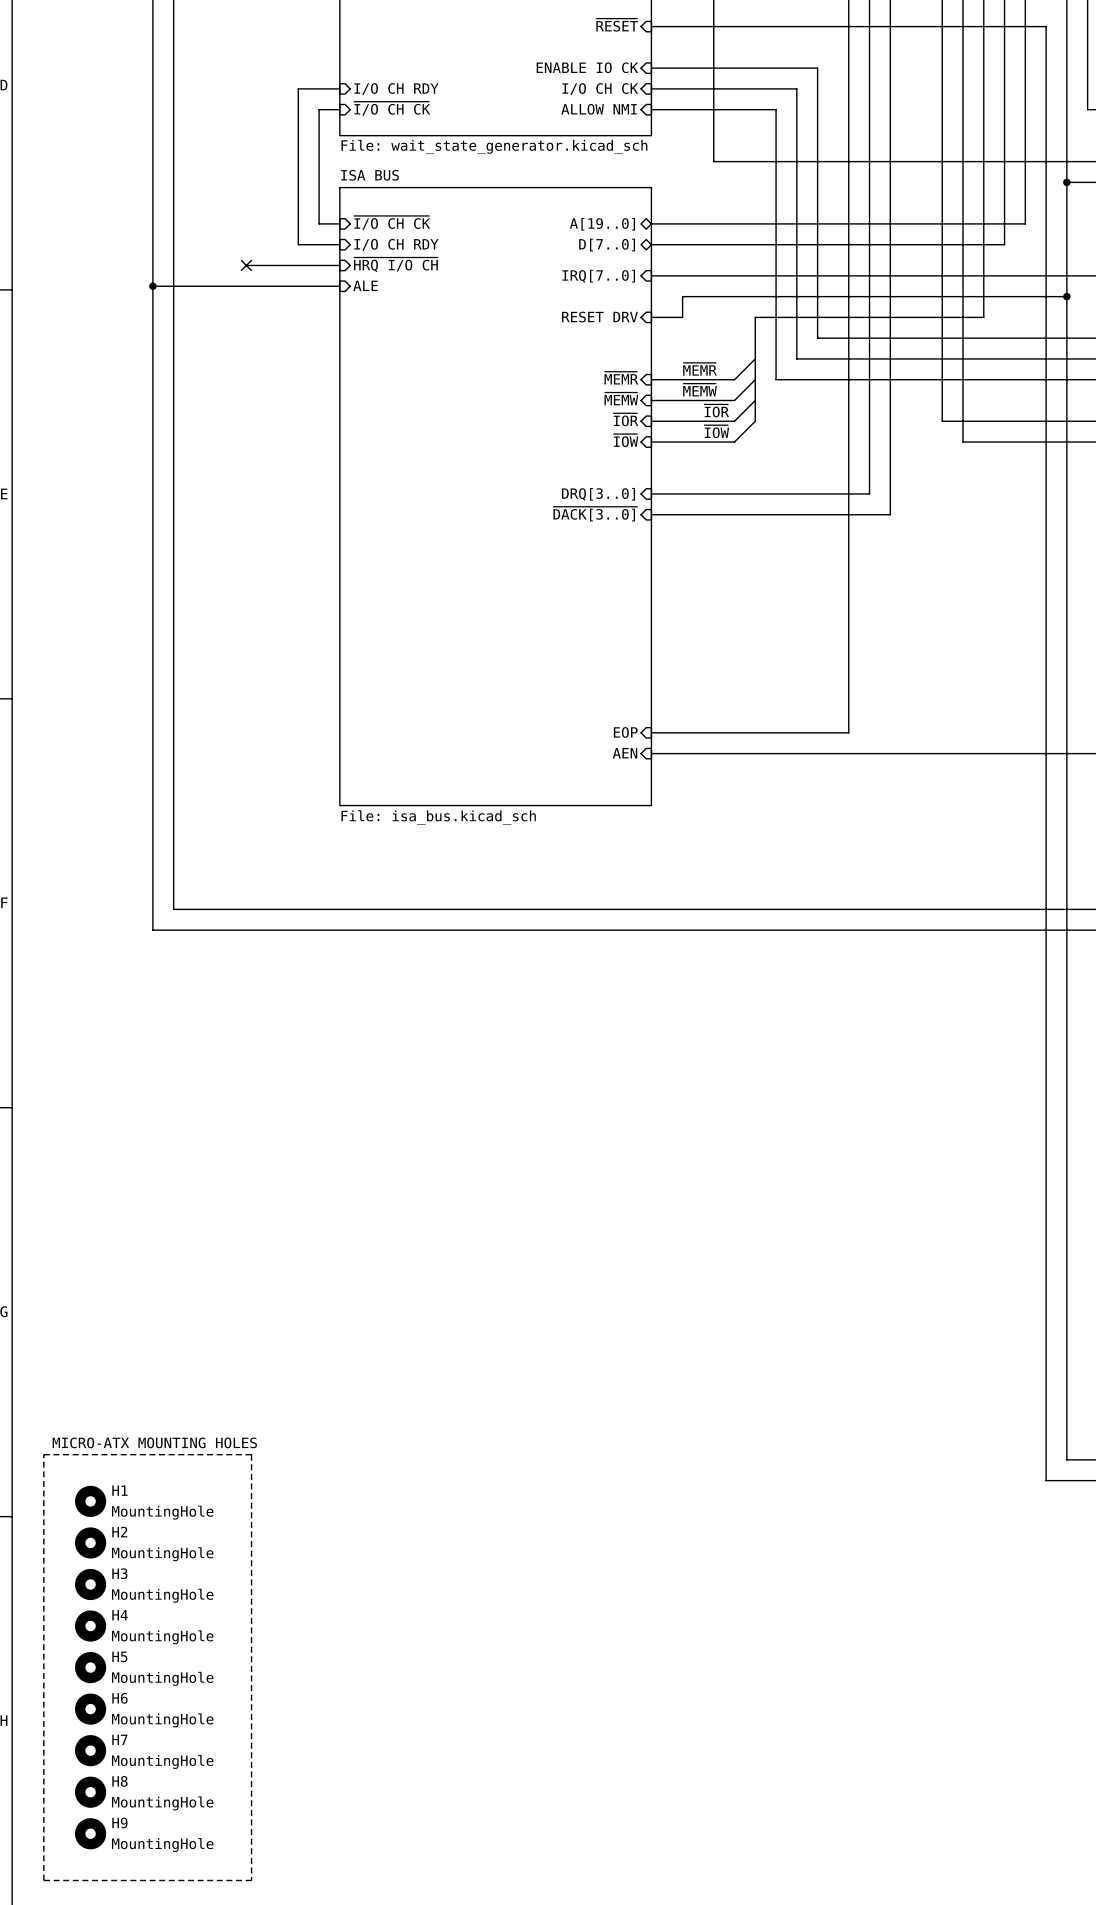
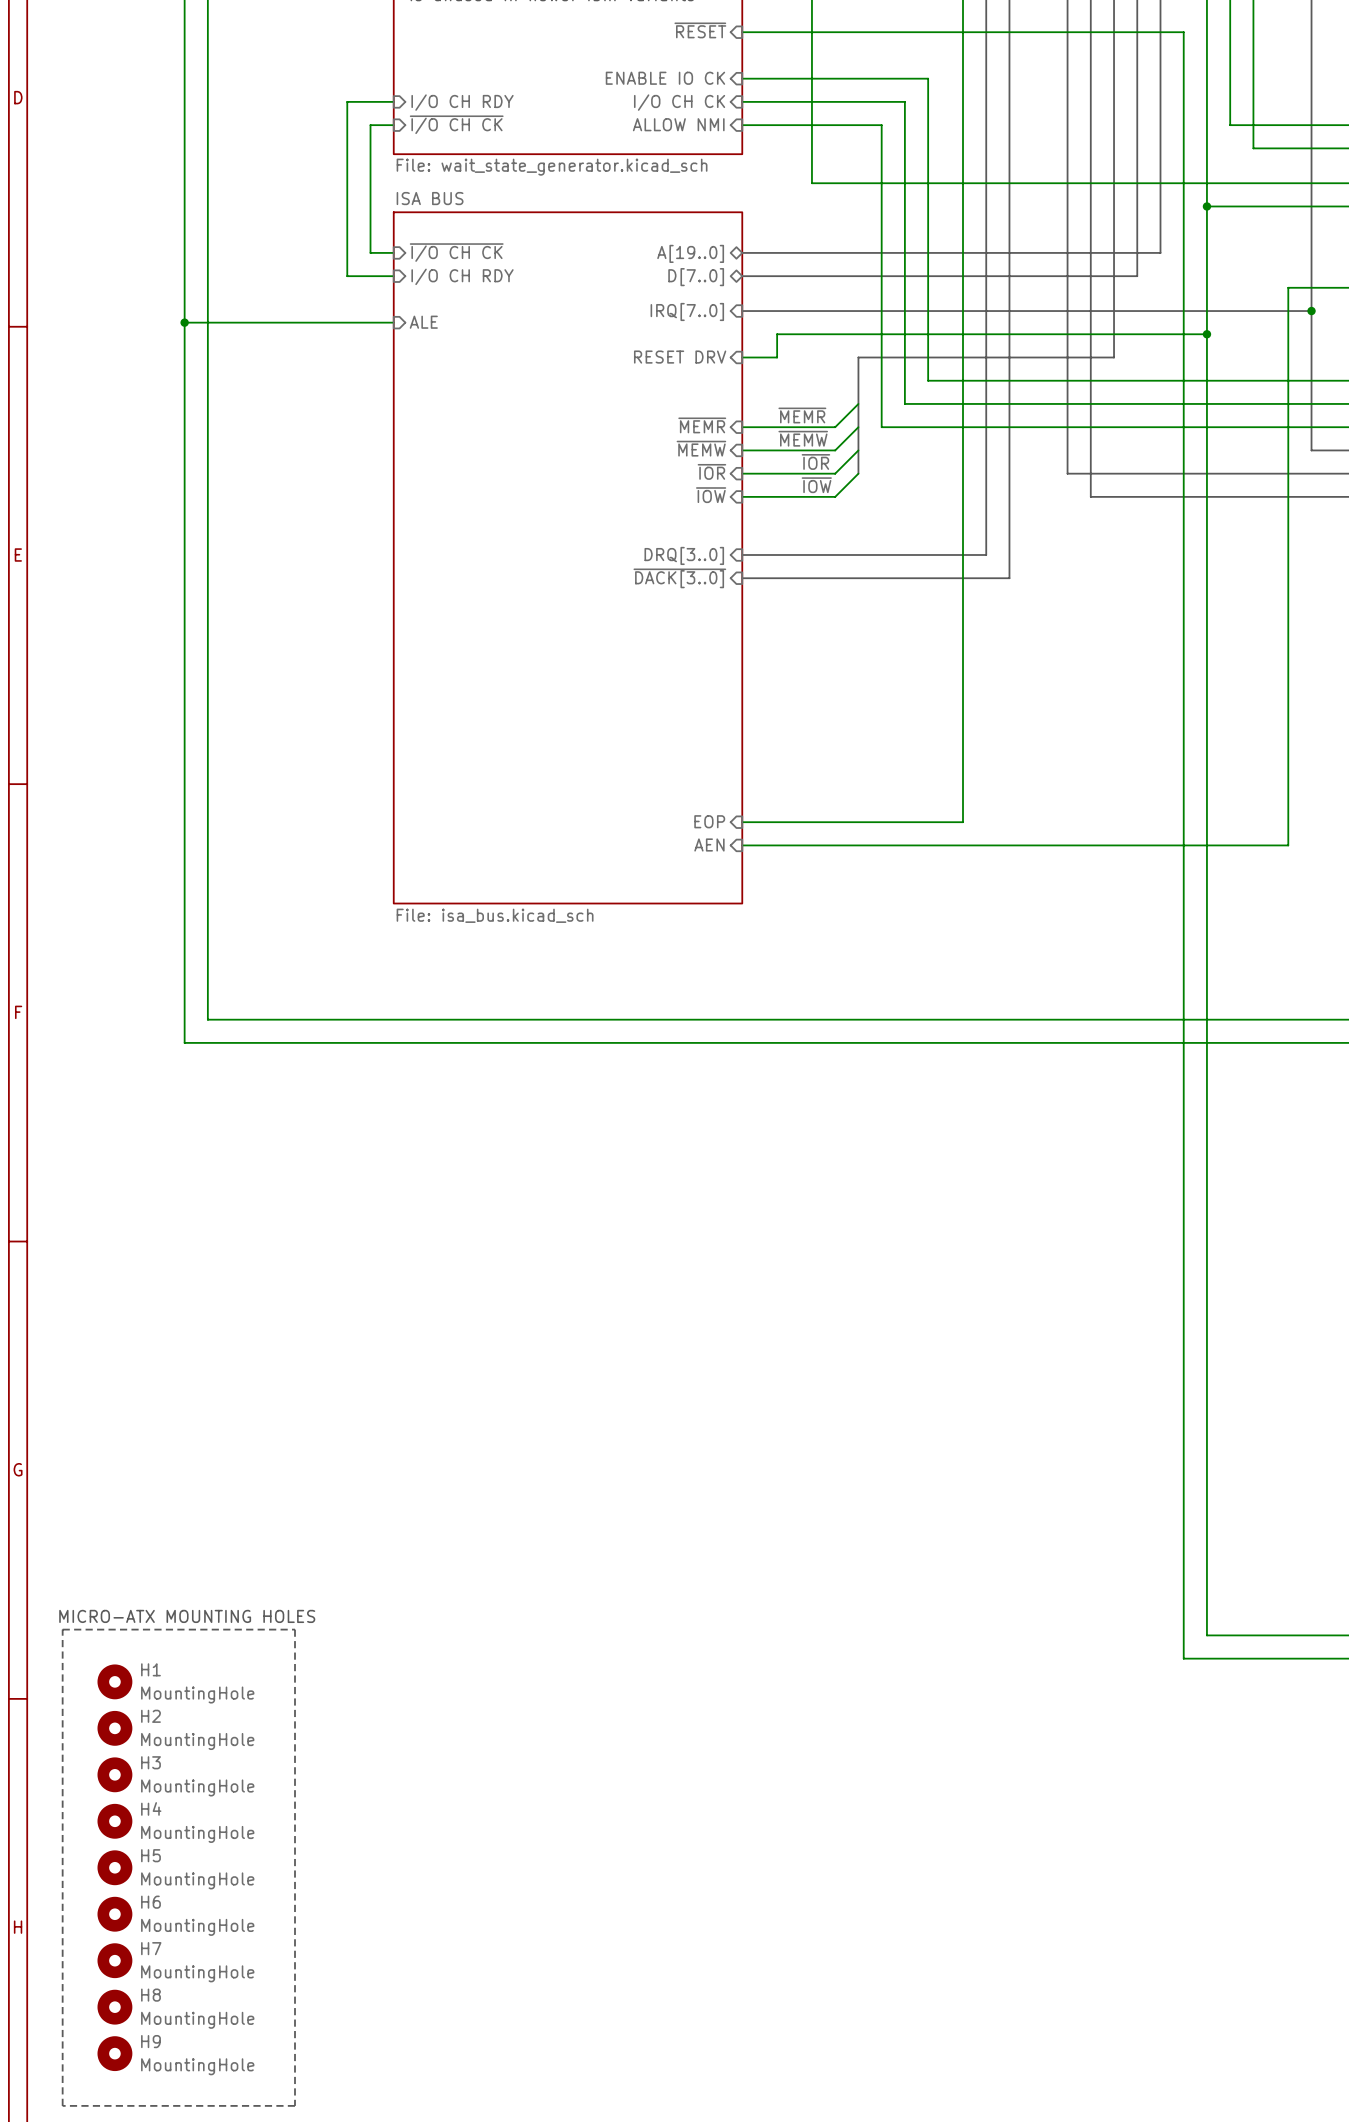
sheet pin: ~{HRQ I/O CH} (395, 264) -> none
wire: (246, 265) (339, 265) -> none
no-connect mark: (246, 265) -> none

